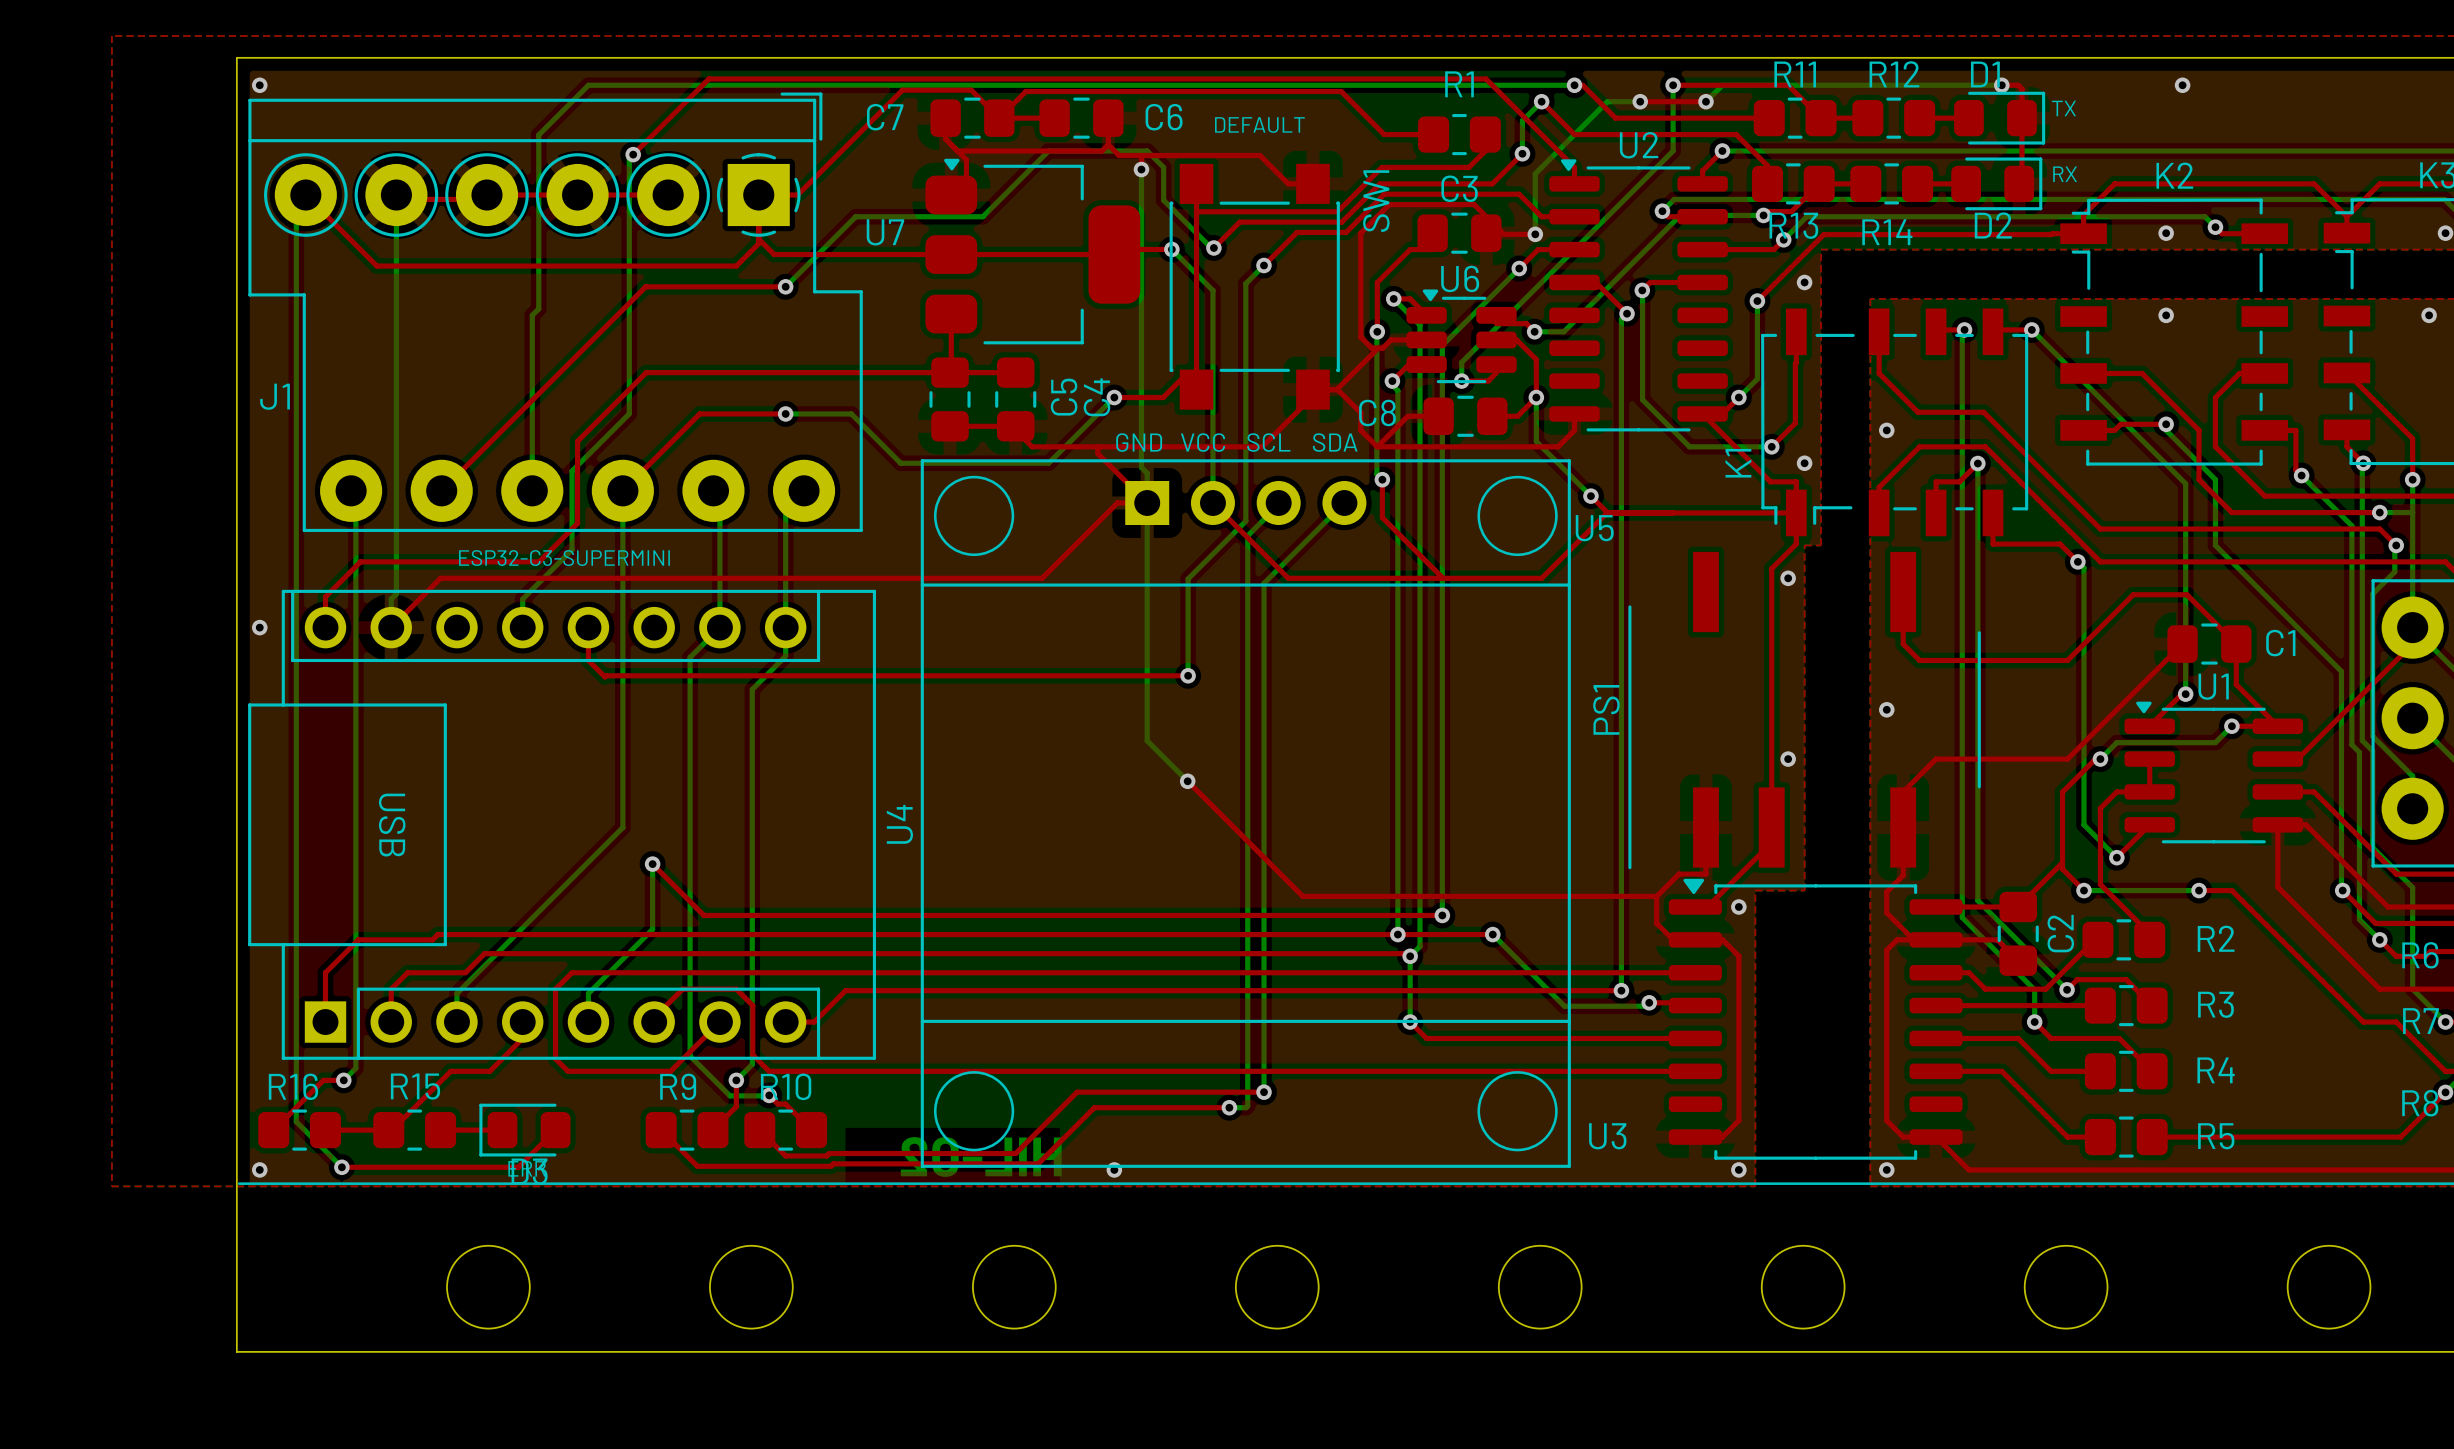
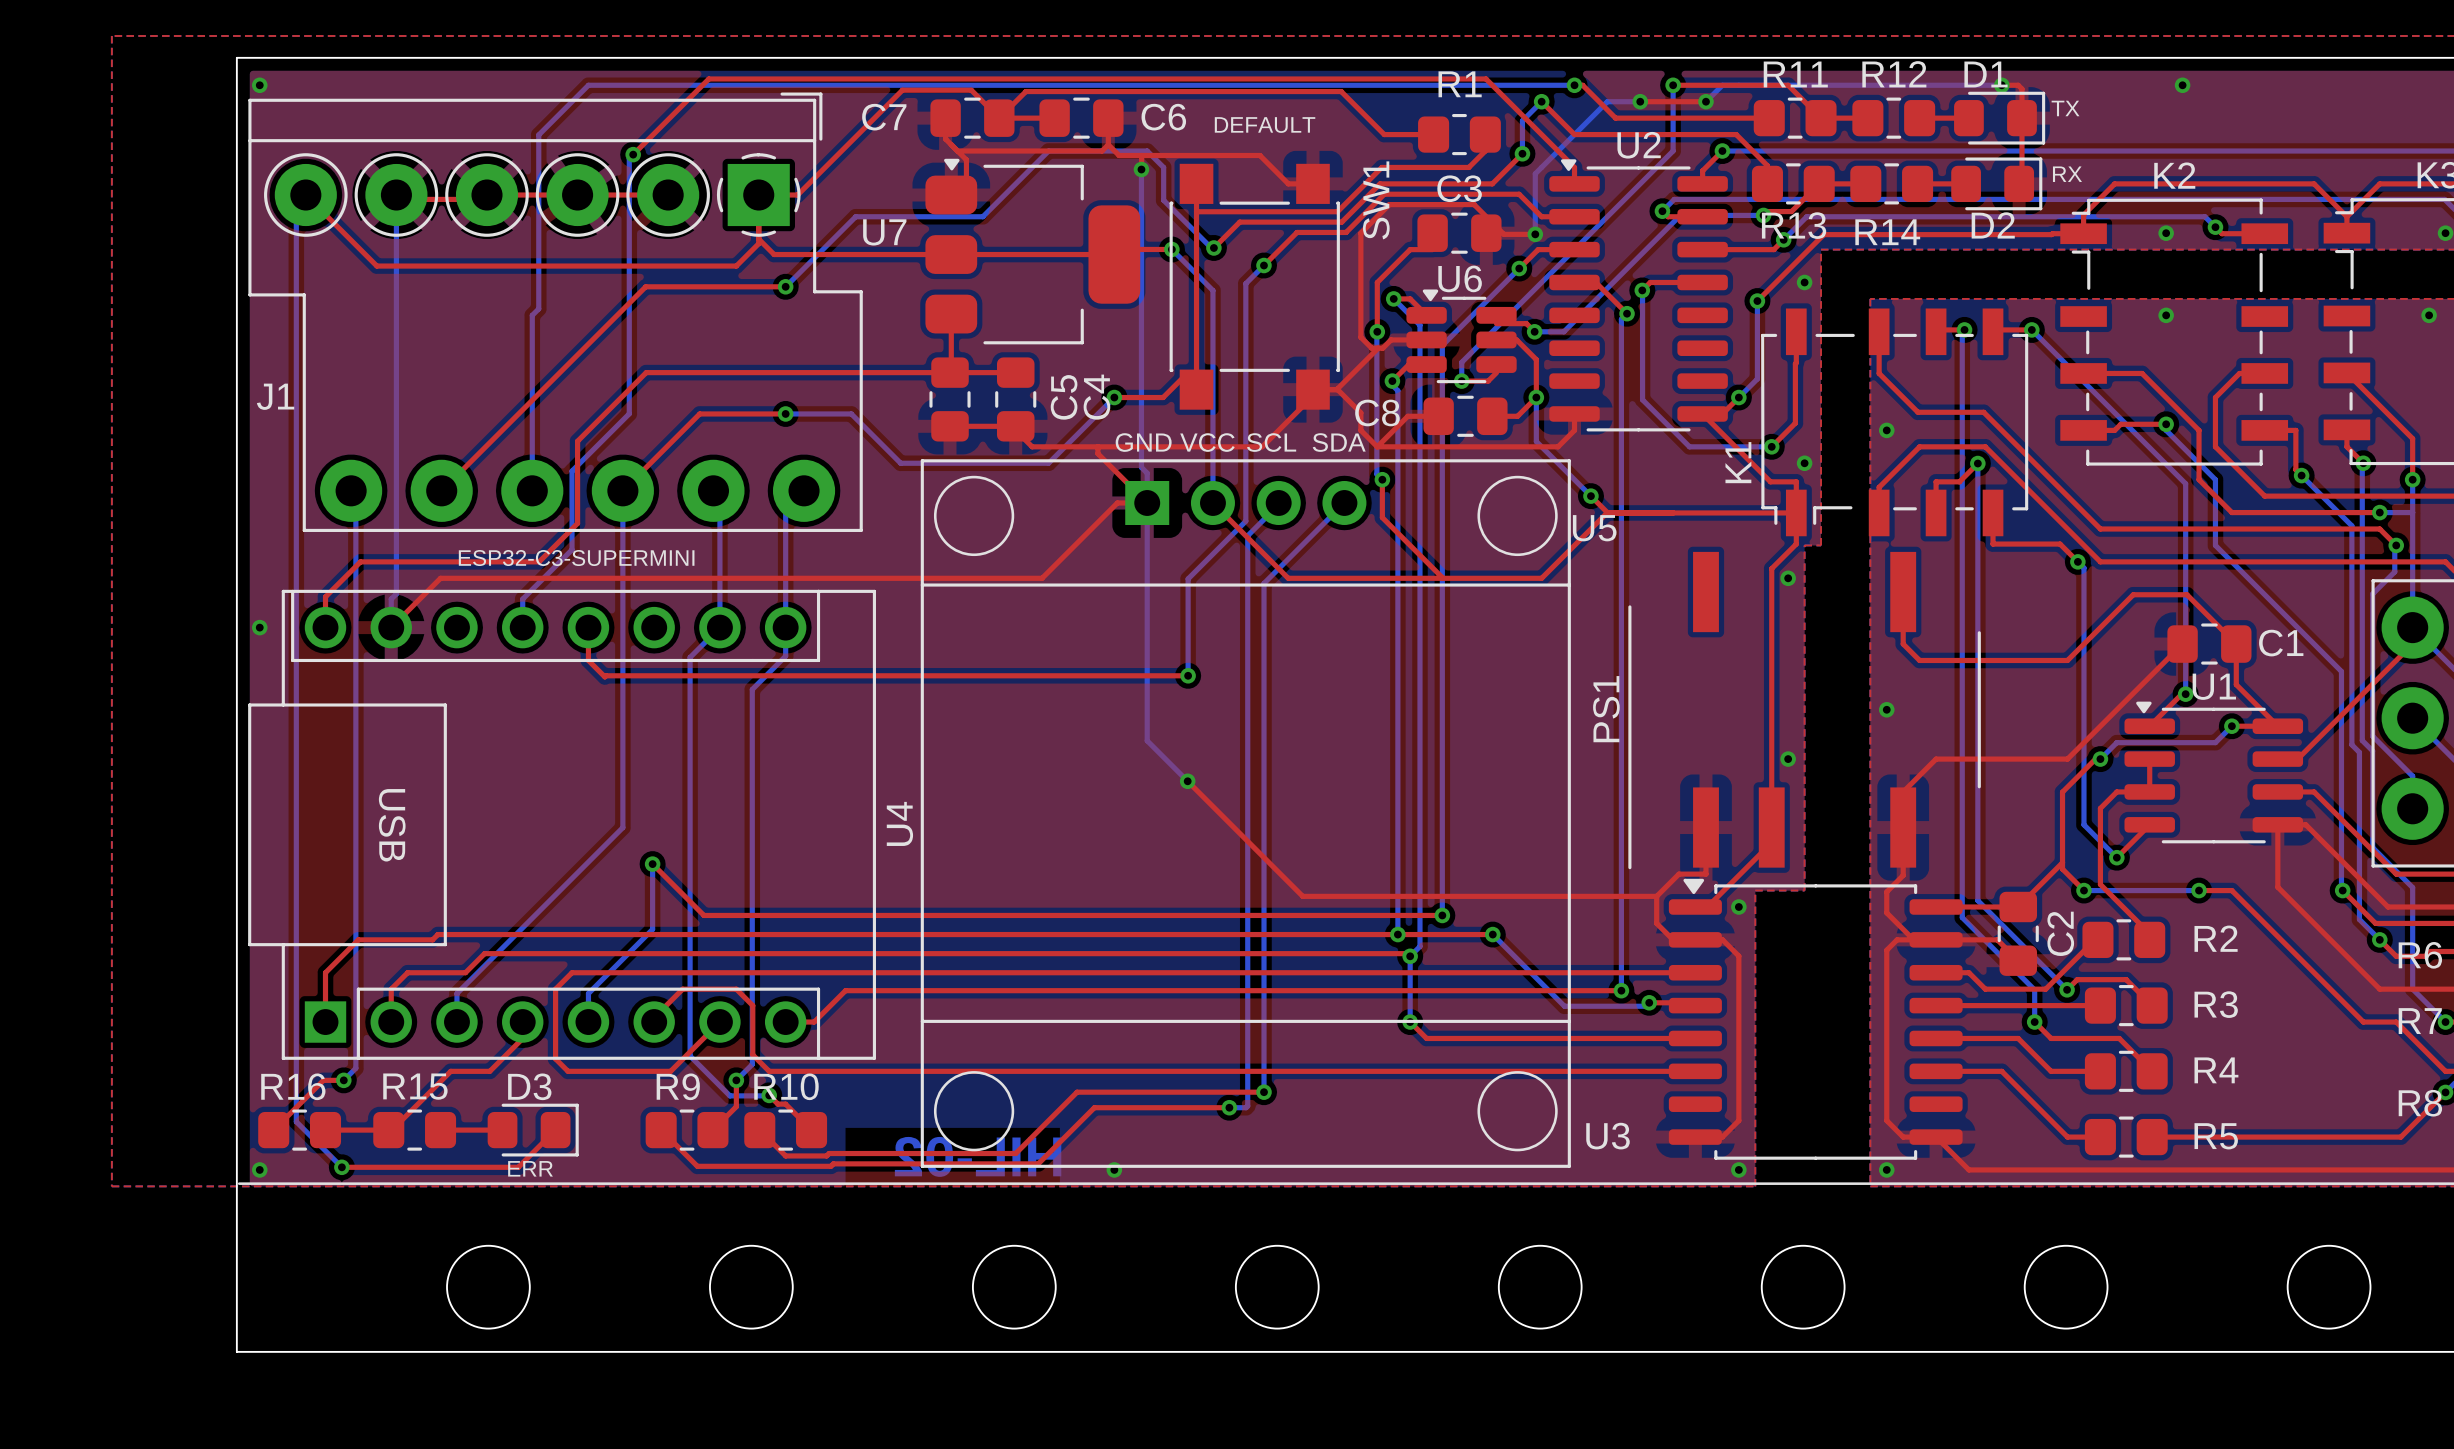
D3 rotation: 0° (524, 1130) -> 180° (533, 1130)

